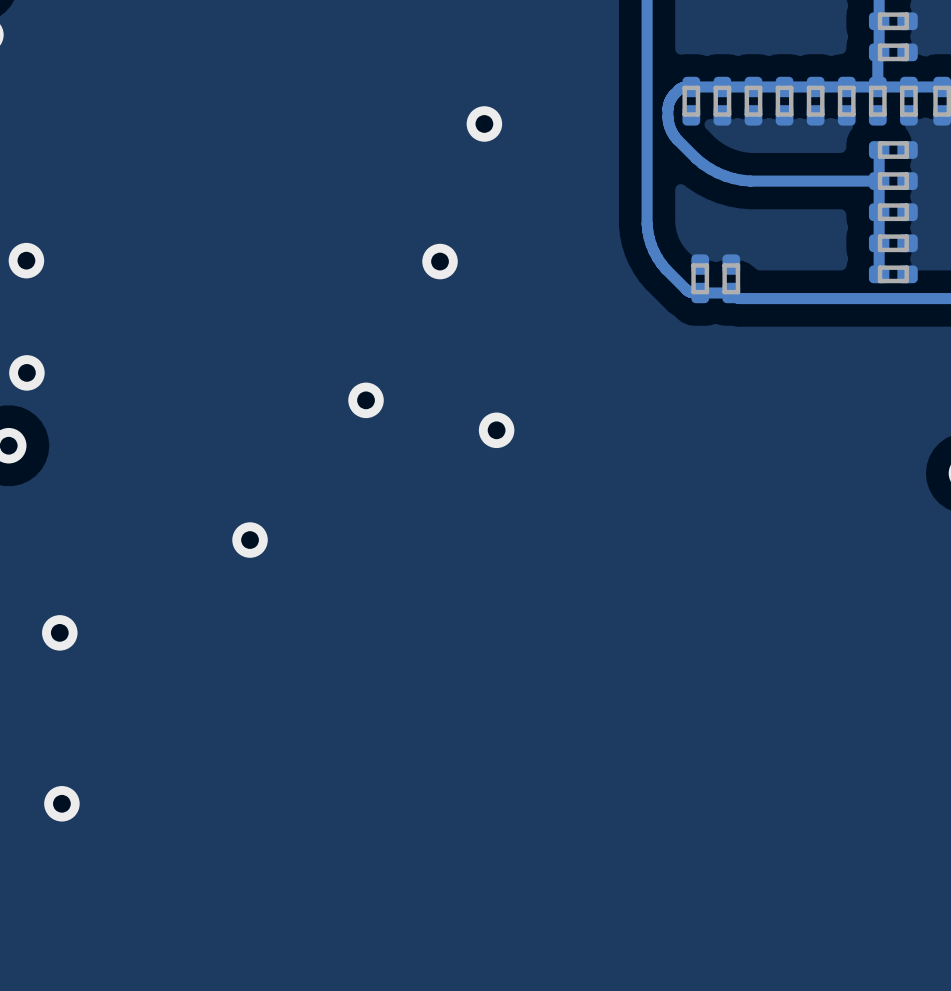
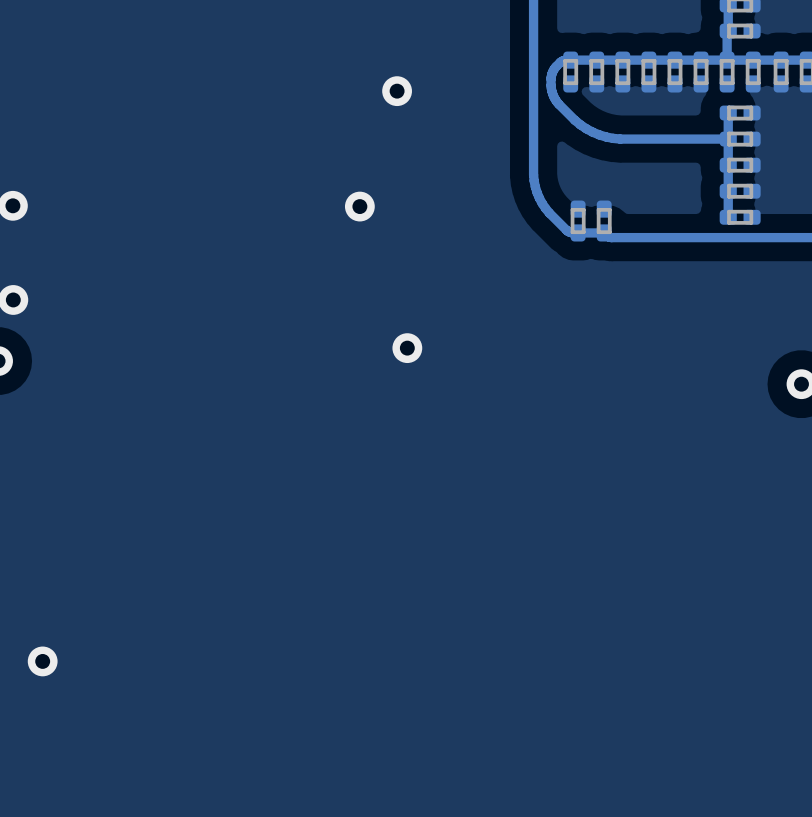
via: (366, 400) -> none
via: (250, 540) -> none
via: (59, 632) -> none

